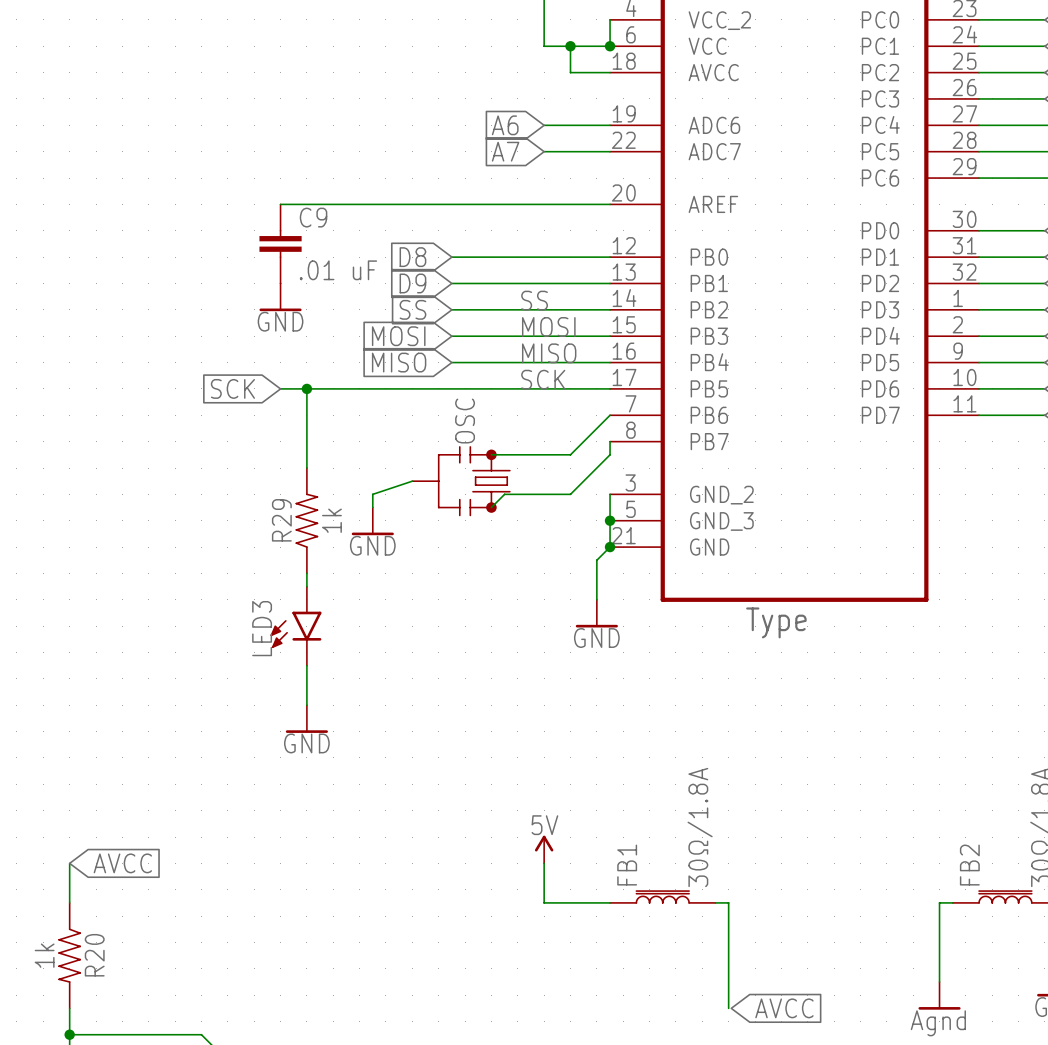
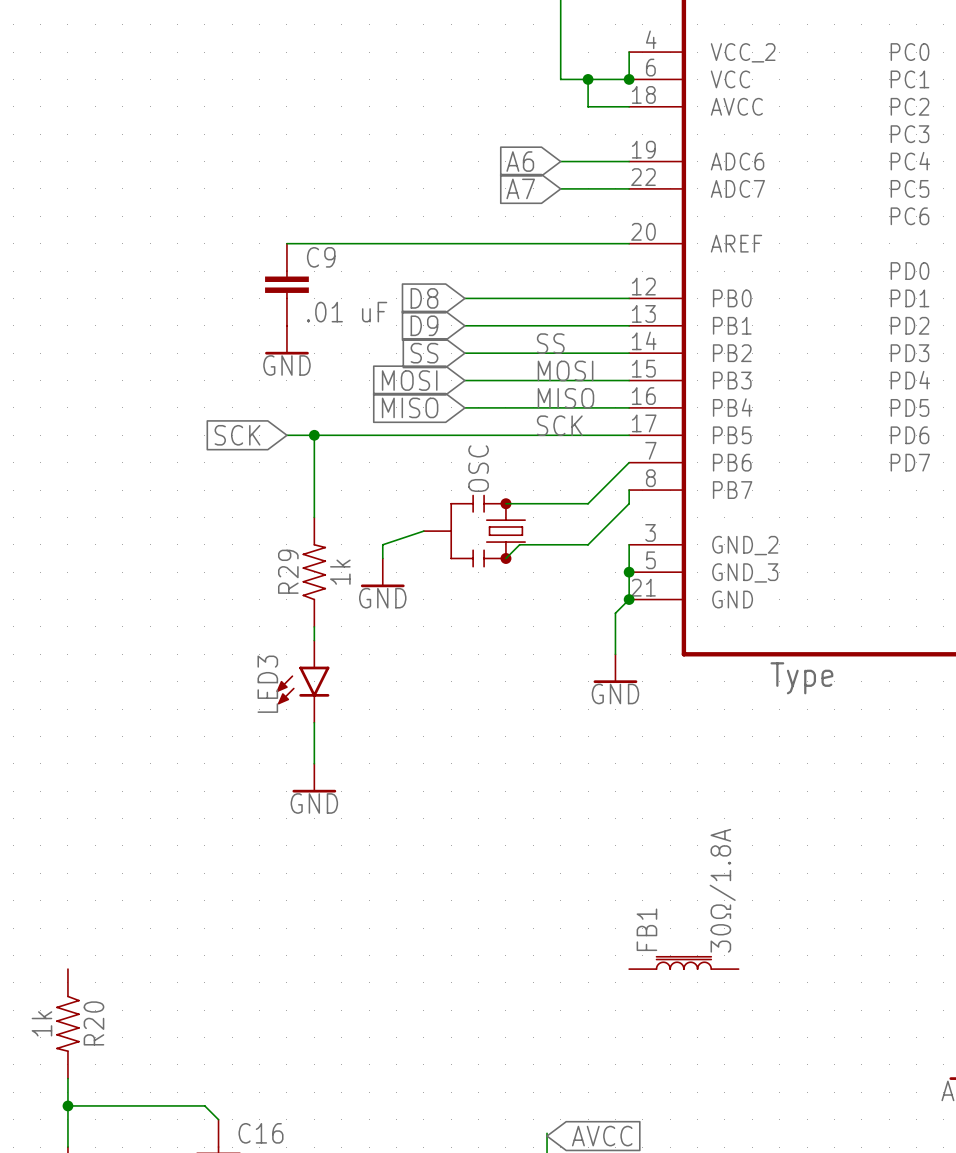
power symbol: 5V (544, 849) -> none
wire: (69, 863) (69, 902) -> none
global label: AVCC (122, 863) -> none
wire: (544, 863) (544, 902) (610, 902) -> none
wire: (715, 902) (728, 902) (728, 1008) -> none
global label: AVCC (784, 1008) -> none

